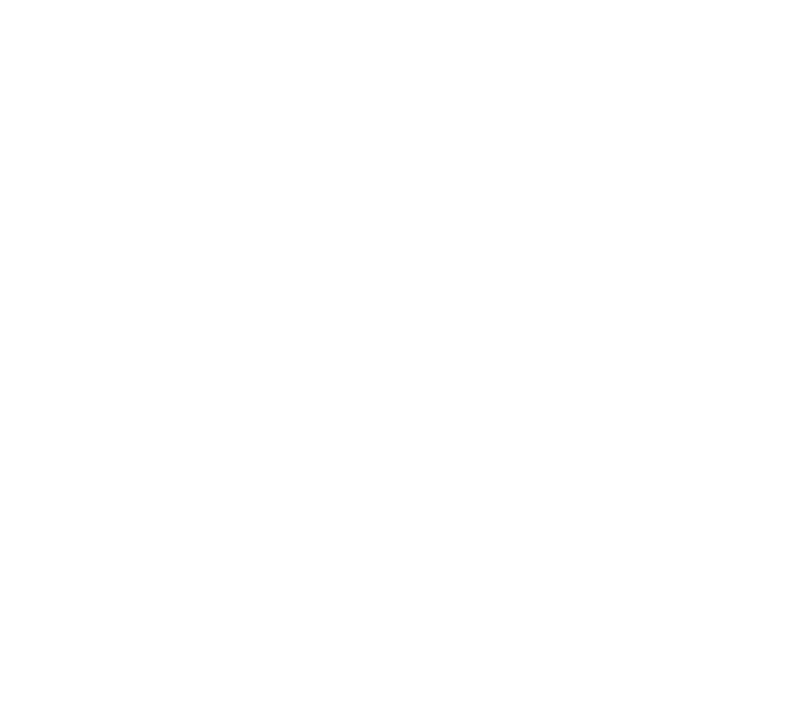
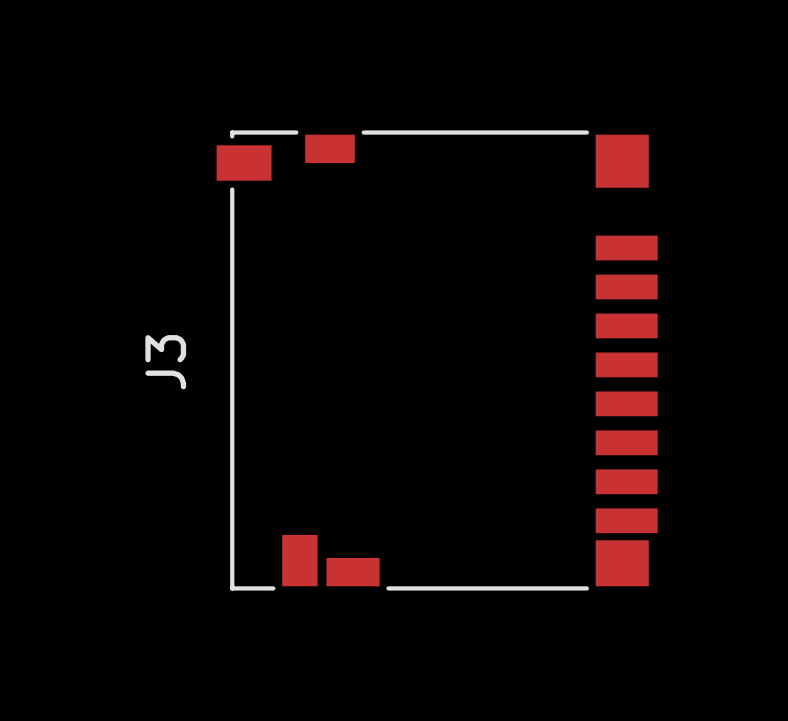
J3: none -> (437, 360)

